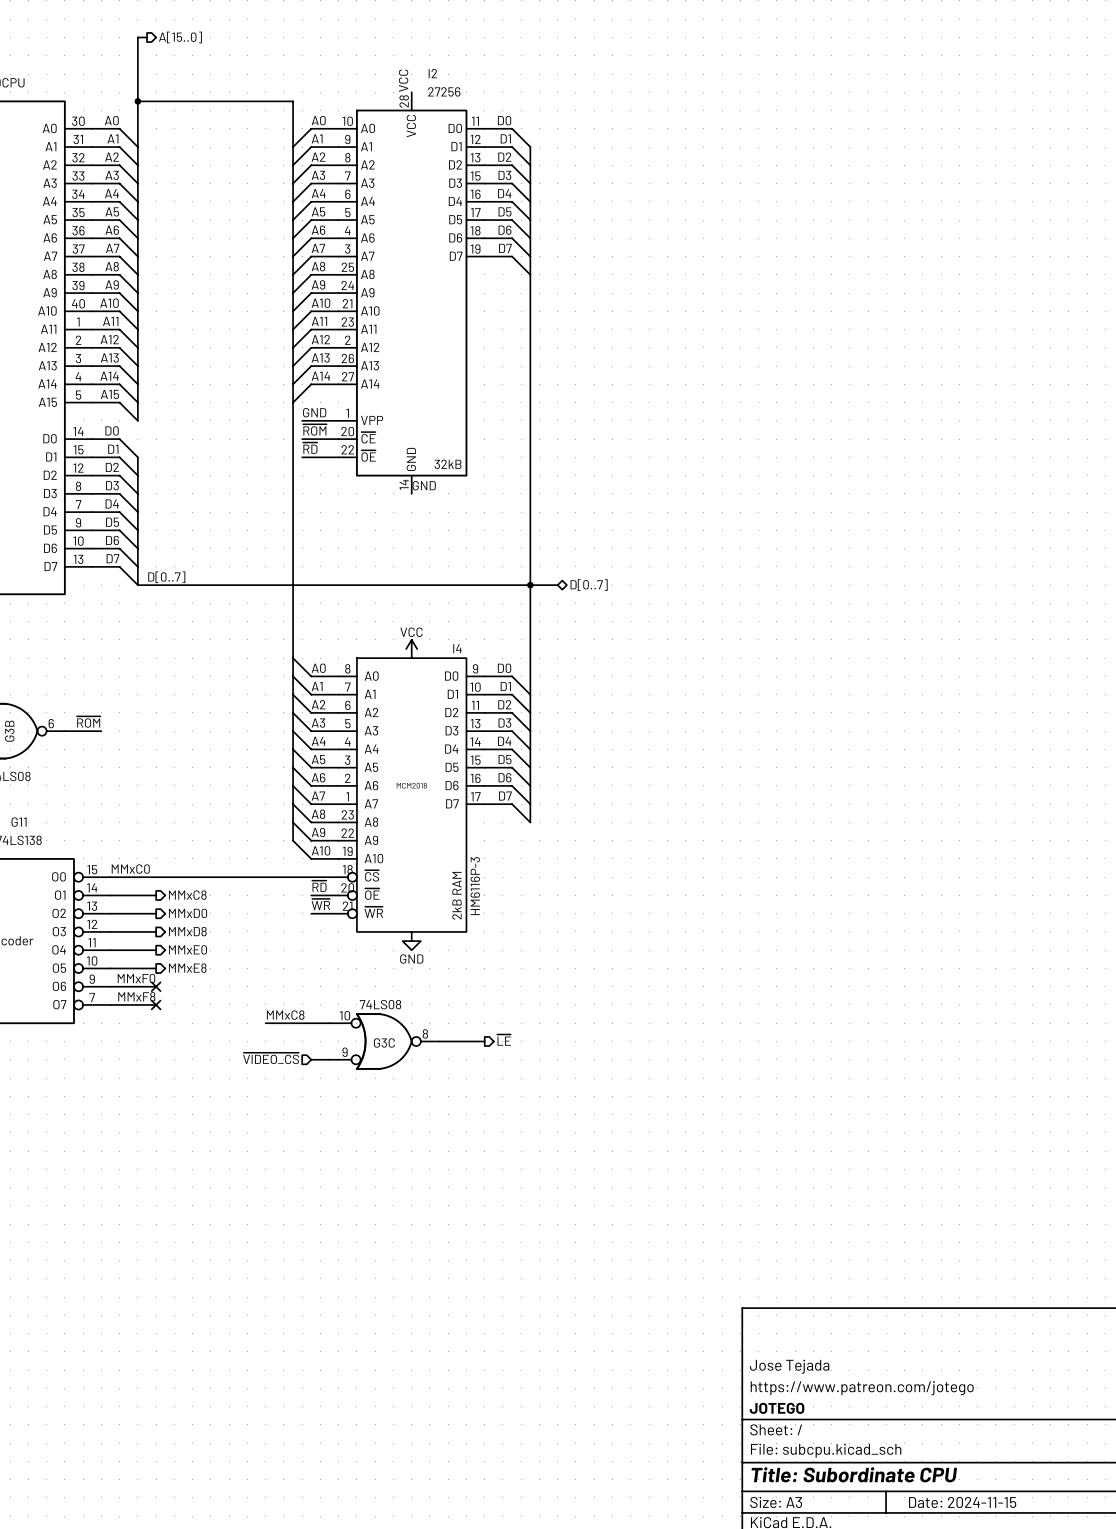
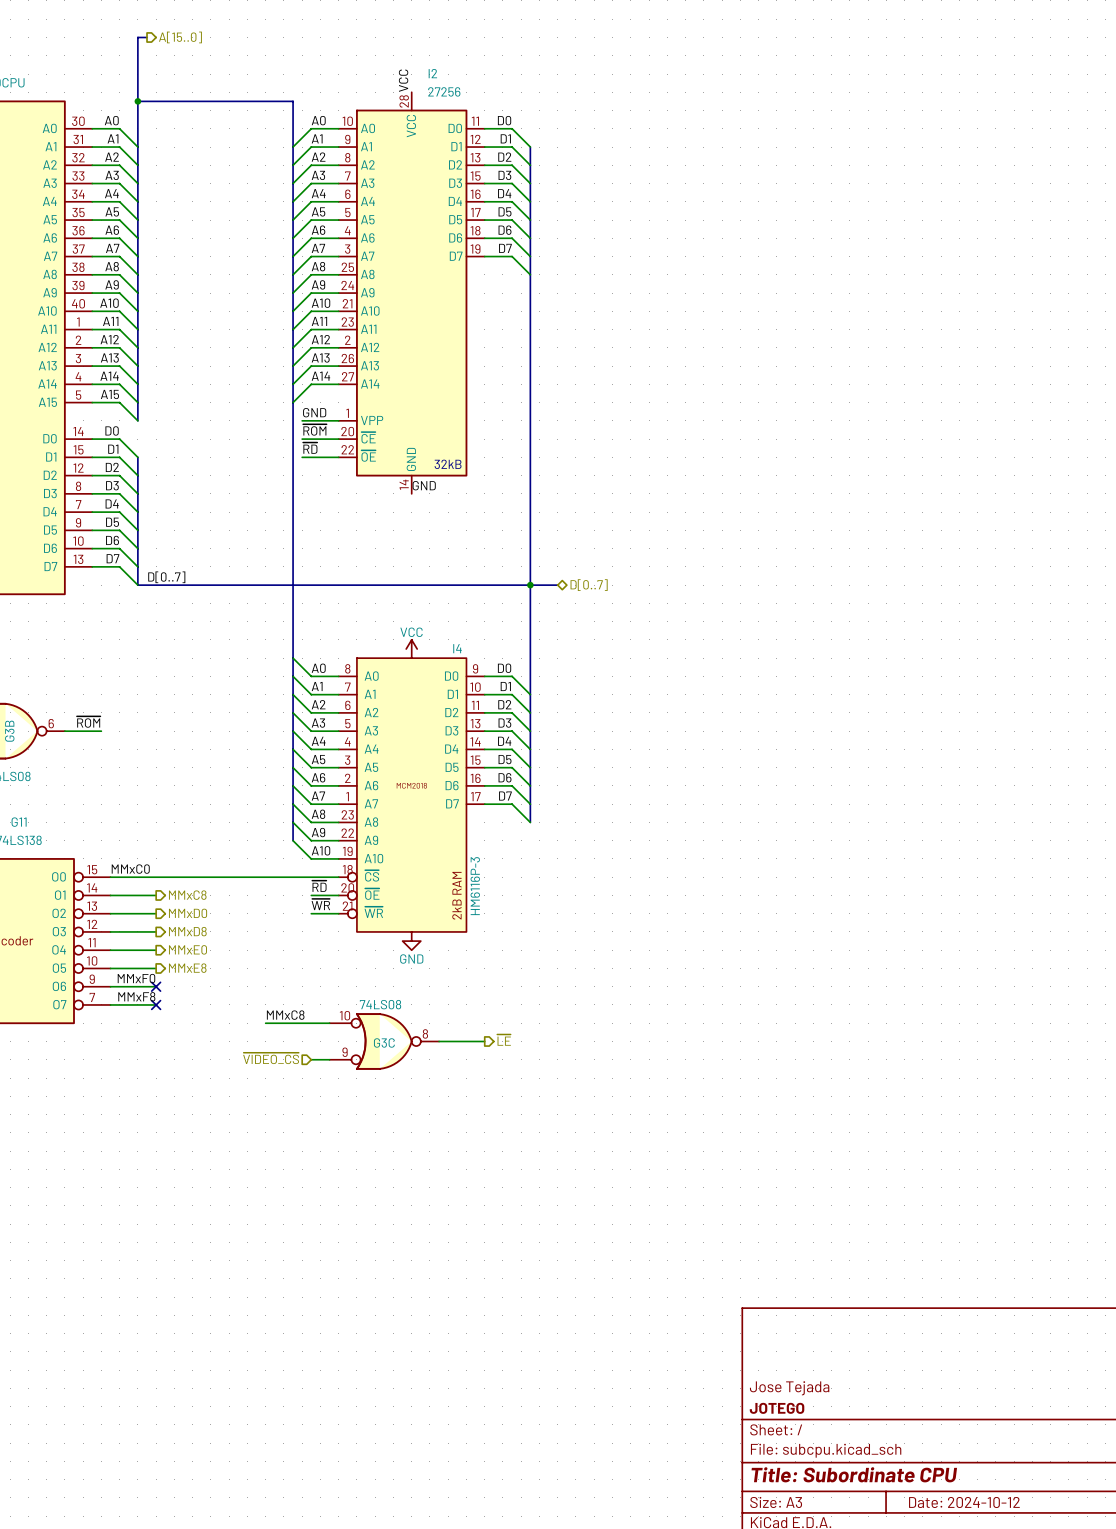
title block: Jose Tejada (789, 1366) -> none
title block: https://www.patreon.com/jotego (862, 1388) -> Jose Tejada (789, 1388)
title block: Date: 2024-11-15 (962, 1502) -> Date: 2024-10-12 (964, 1502)

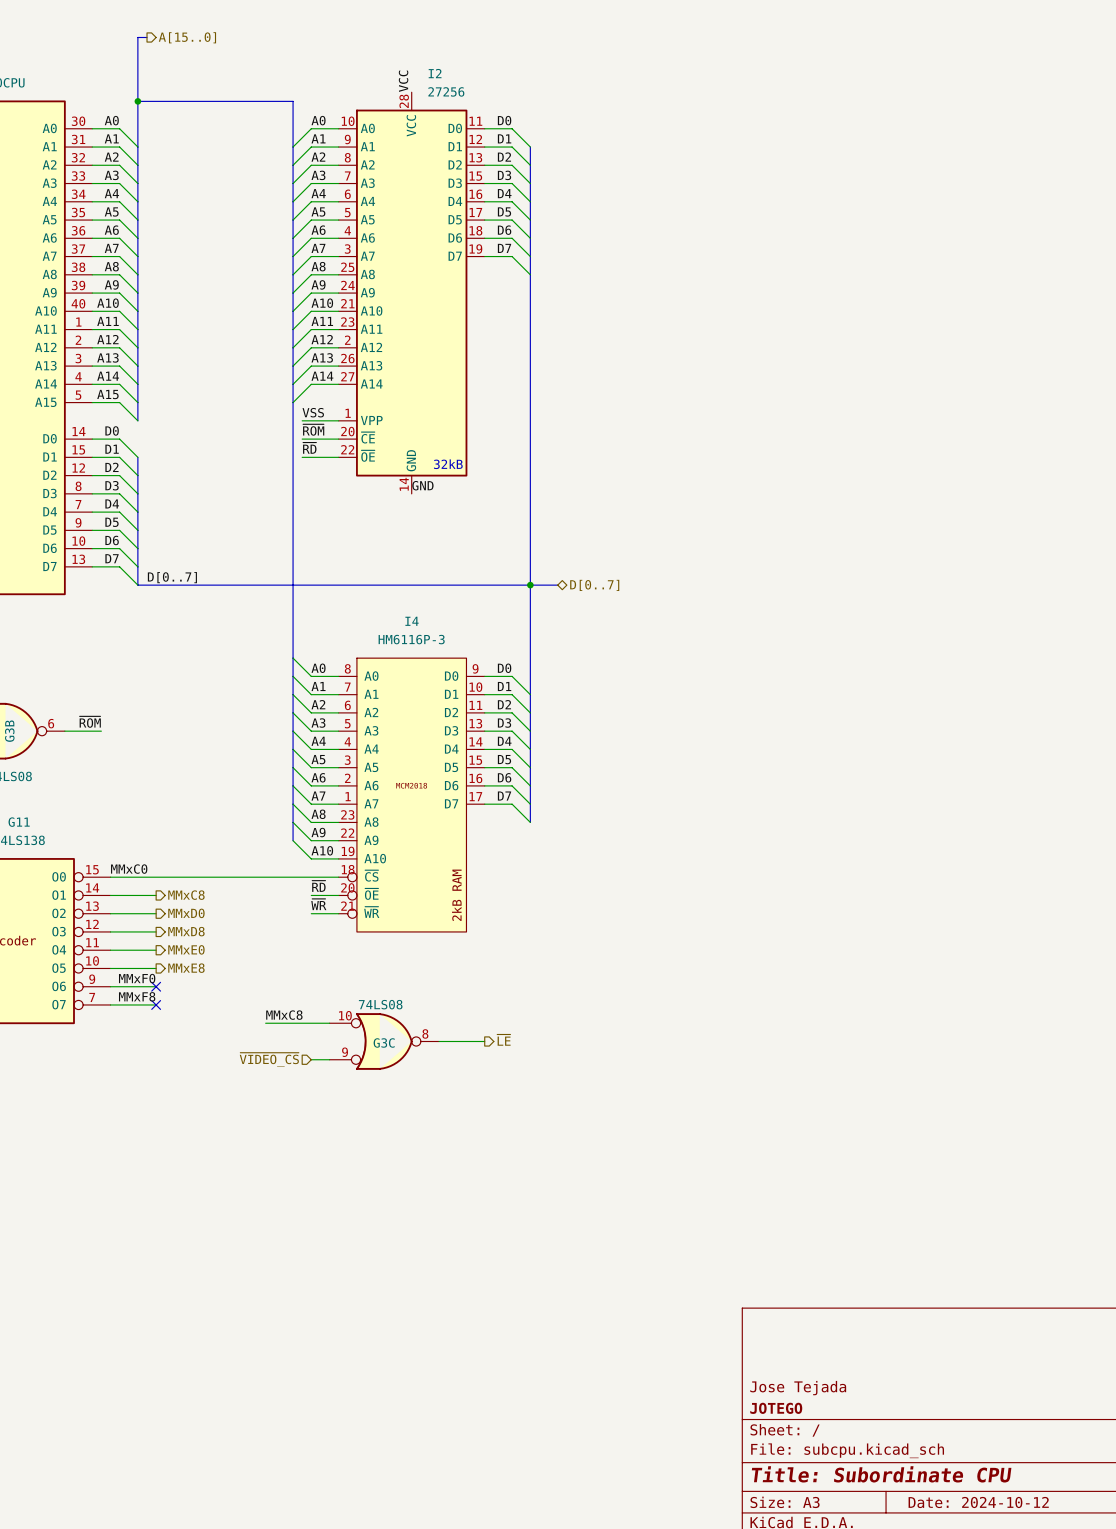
label: GND (314, 412) -> VSS (313, 412)
I4 name position: I4 (457, 648) -> I4 (412, 621)
power symbol: VCC (411, 649) -> none
I4 value rotation: 0° (475, 886) -> 90° clockwise (411, 639)
I4 value position: HM6116P-3 (475, 886) -> HM6116P-3 (411, 639)
power symbol: GND (411, 941) -> none

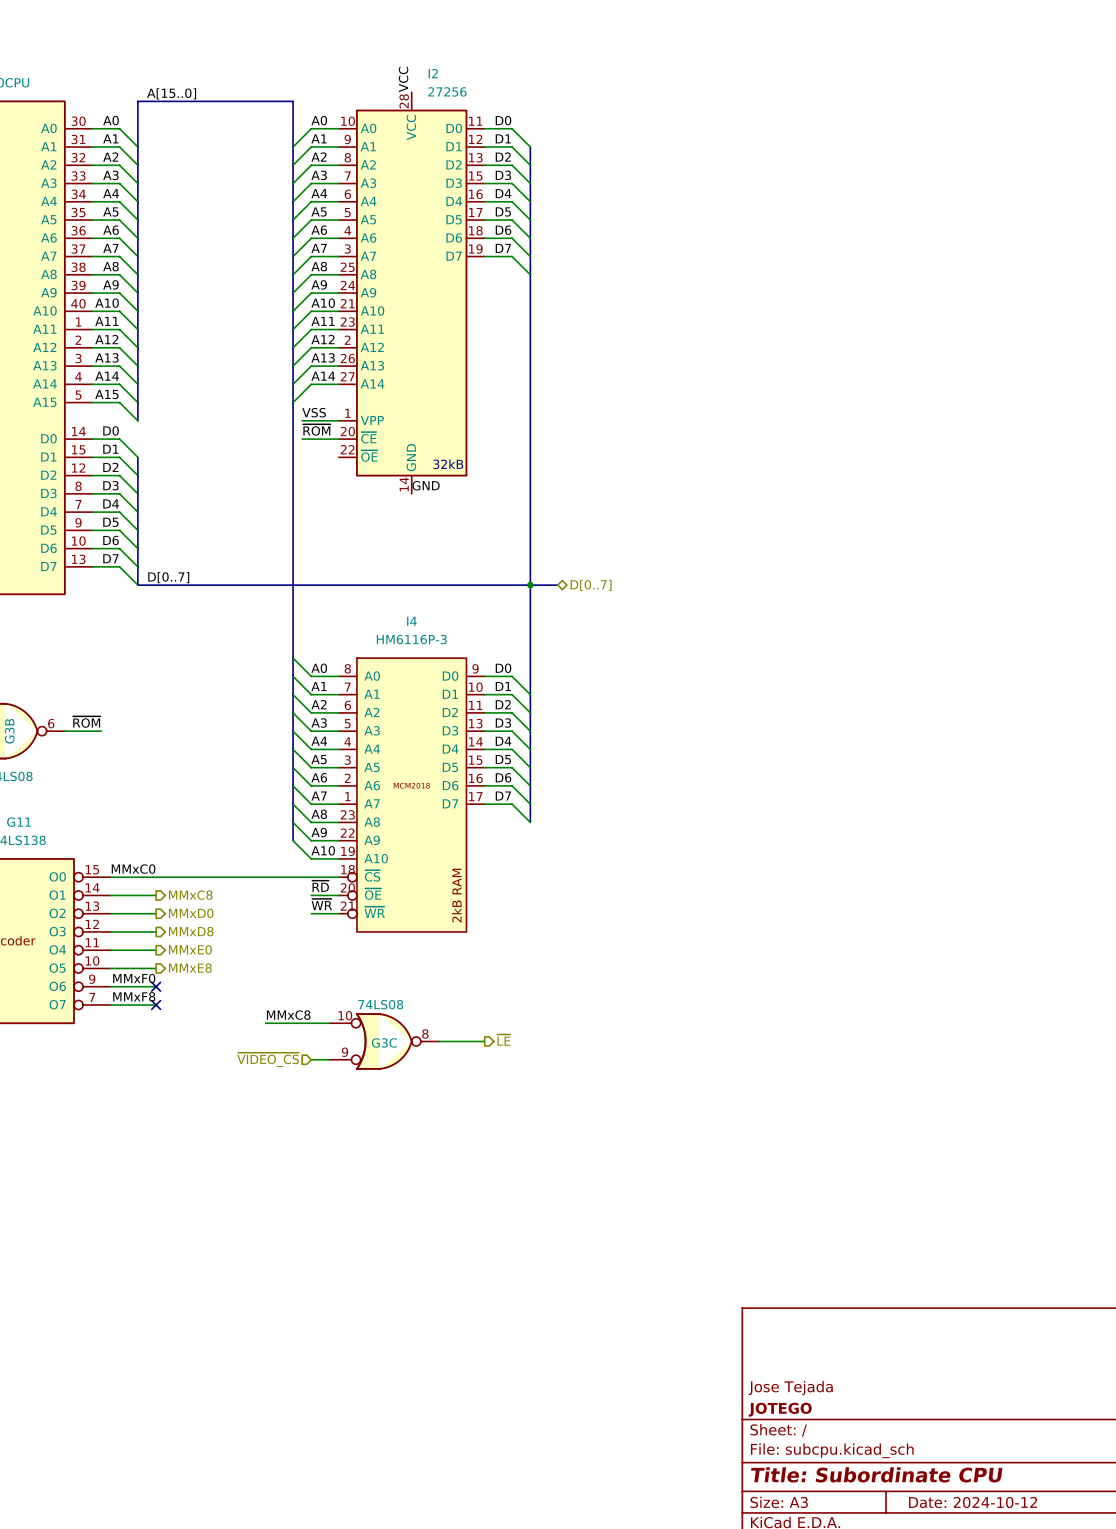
bus: (147, 37) (137, 37) (137, 101) -> none
hierarchical label: A[15..0] (187, 37) -> none
label: none -> A[15..0] (171, 93)
junction: (137, 101) -> none
label: ~{RD} (309, 448) -> none
wire: (302, 457) (338, 457) -> none

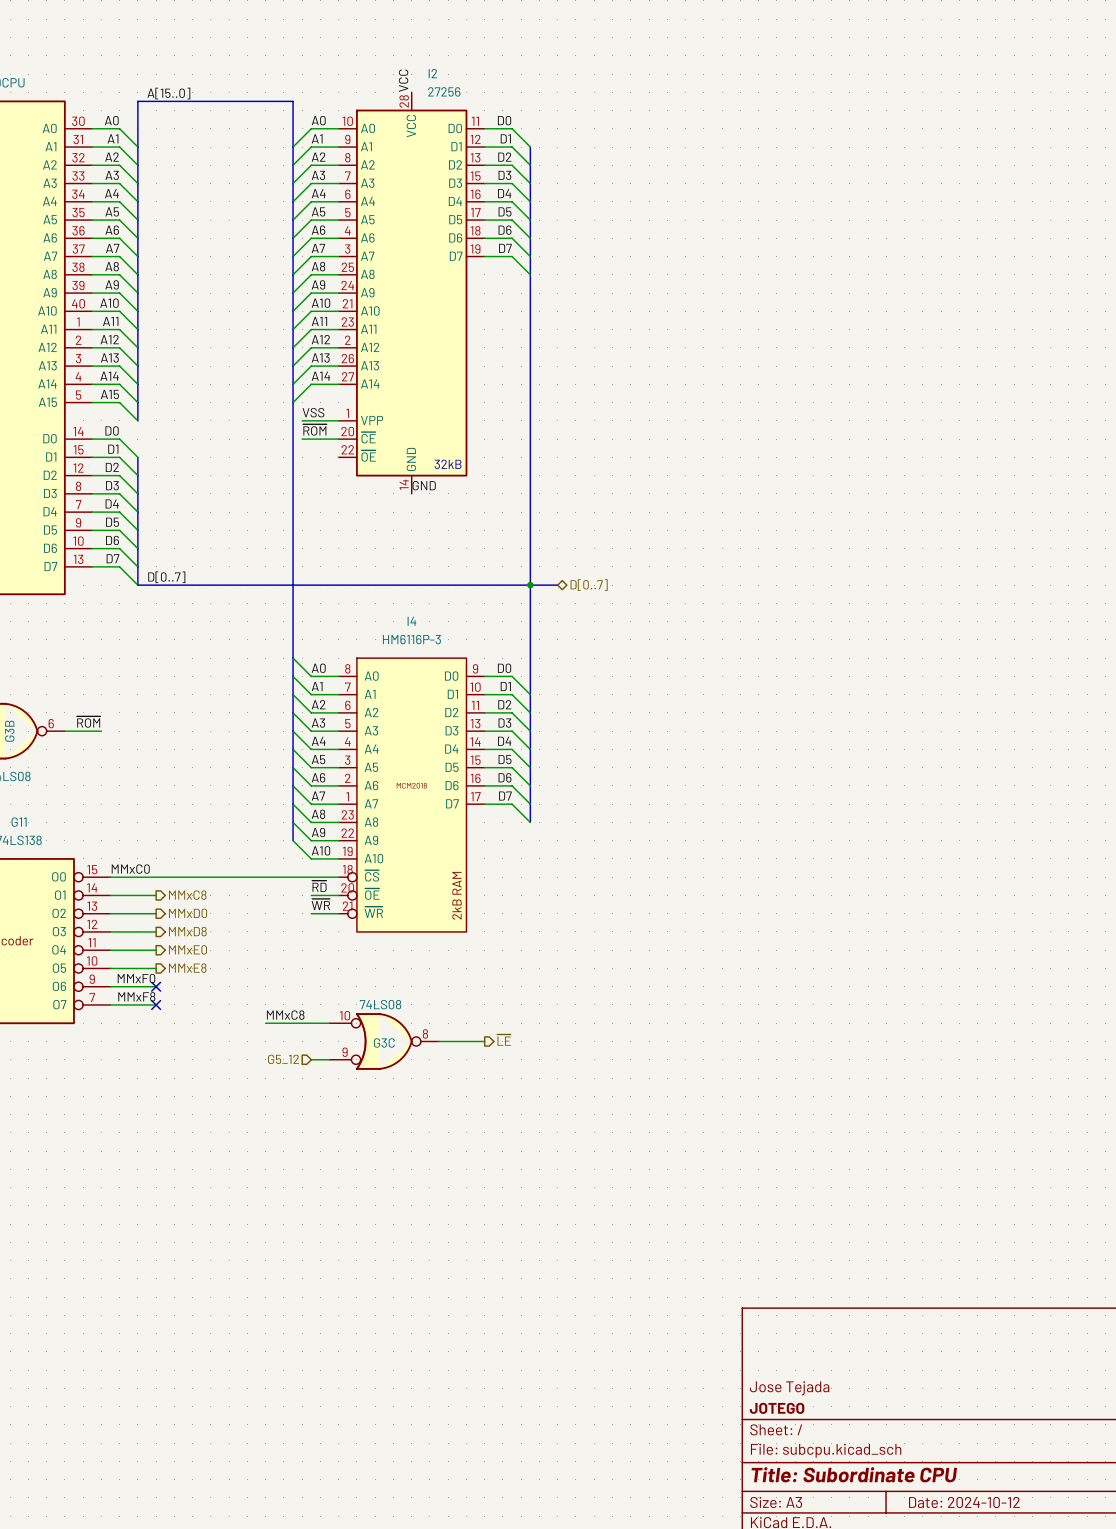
hierarchical label: ~{VIDEO_CS} (268, 1059) -> G5_12 (283, 1059)

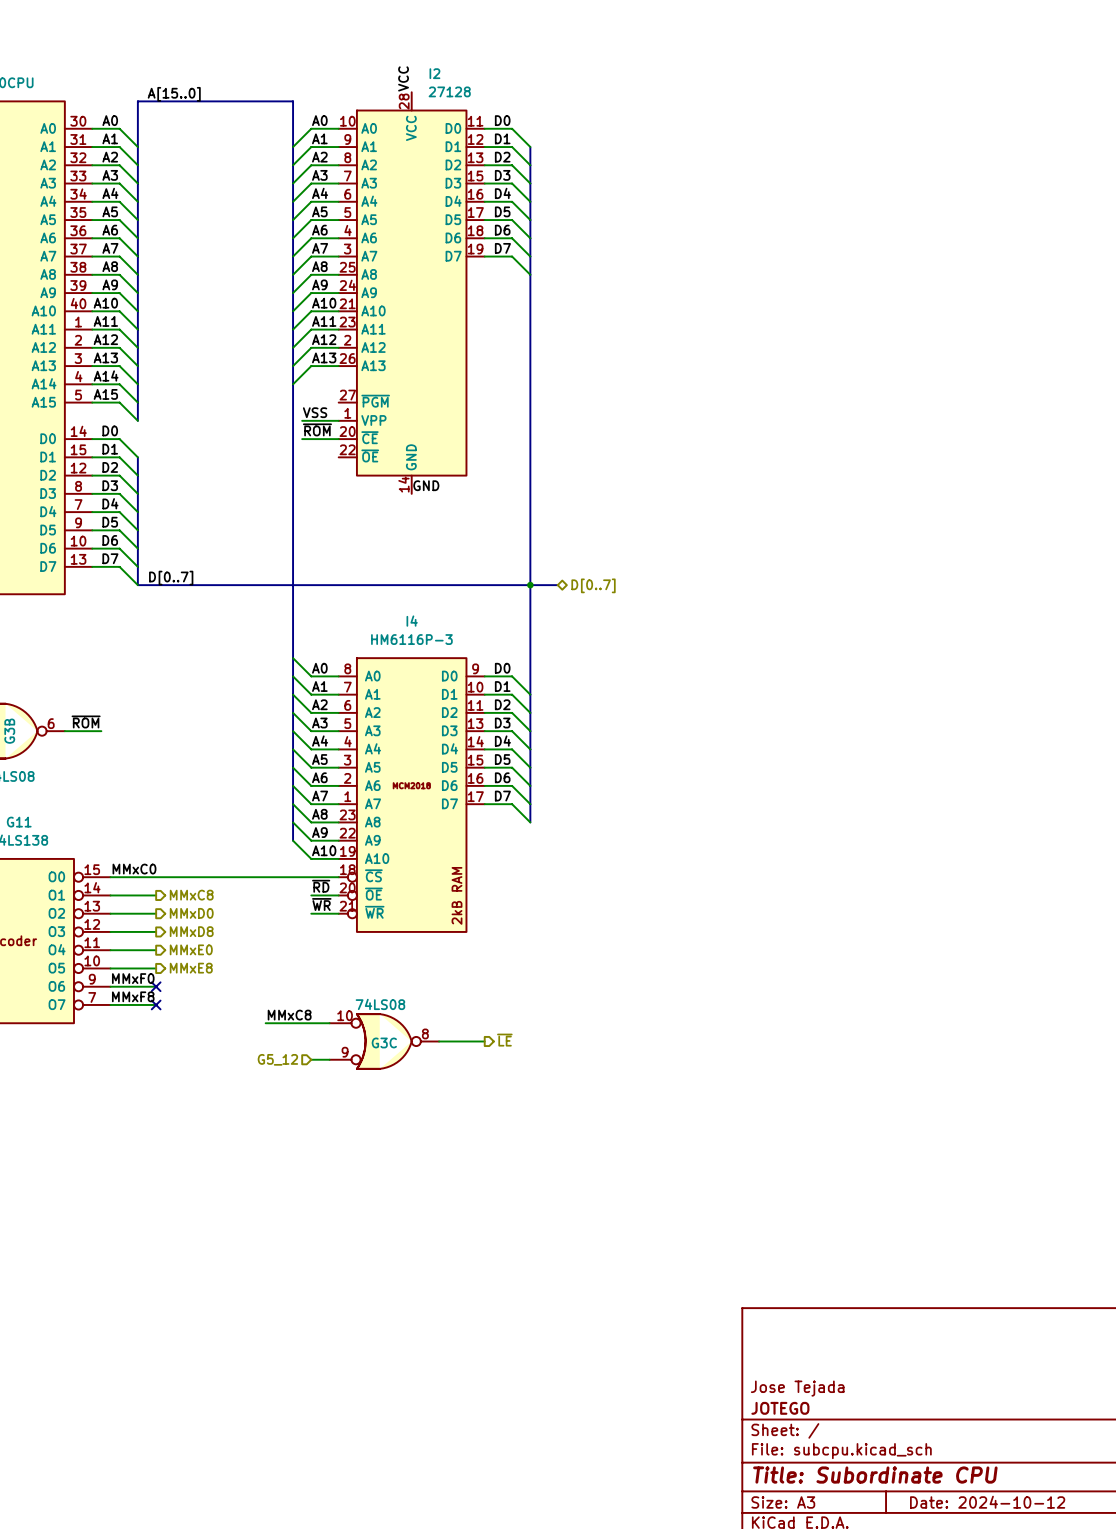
I2 value: 27256 (444, 91) -> 27128 (449, 91)
I2 symbol: [338, 92, 485, 494] -> [338, 92, 485, 494]
label: A14 (320, 376) -> none
wire: (338, 384) (311, 384) (293, 402) -> none
text: 32kB (448, 464) -> none

